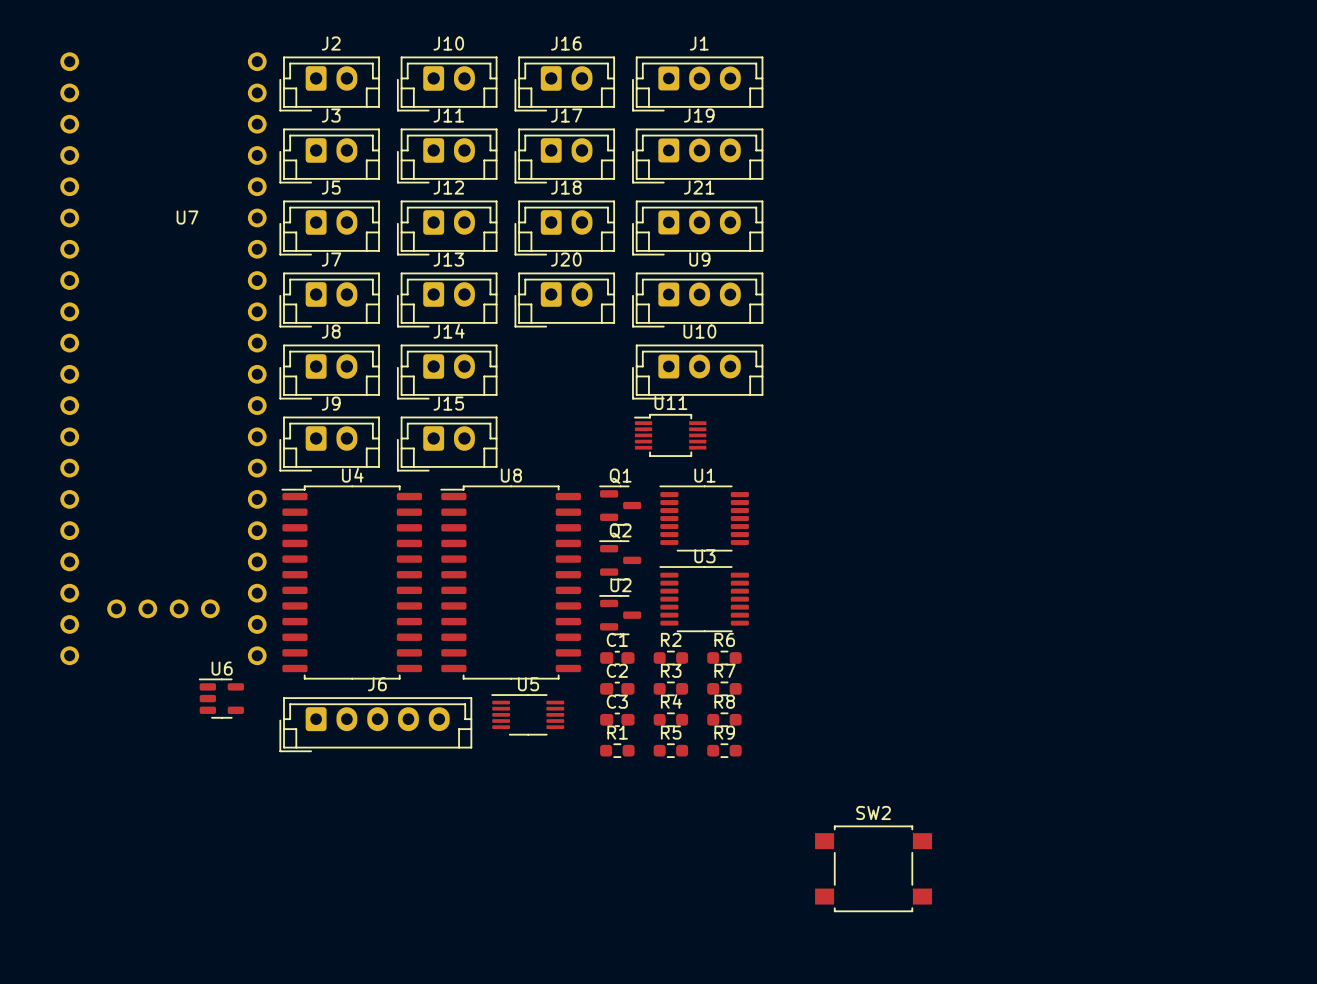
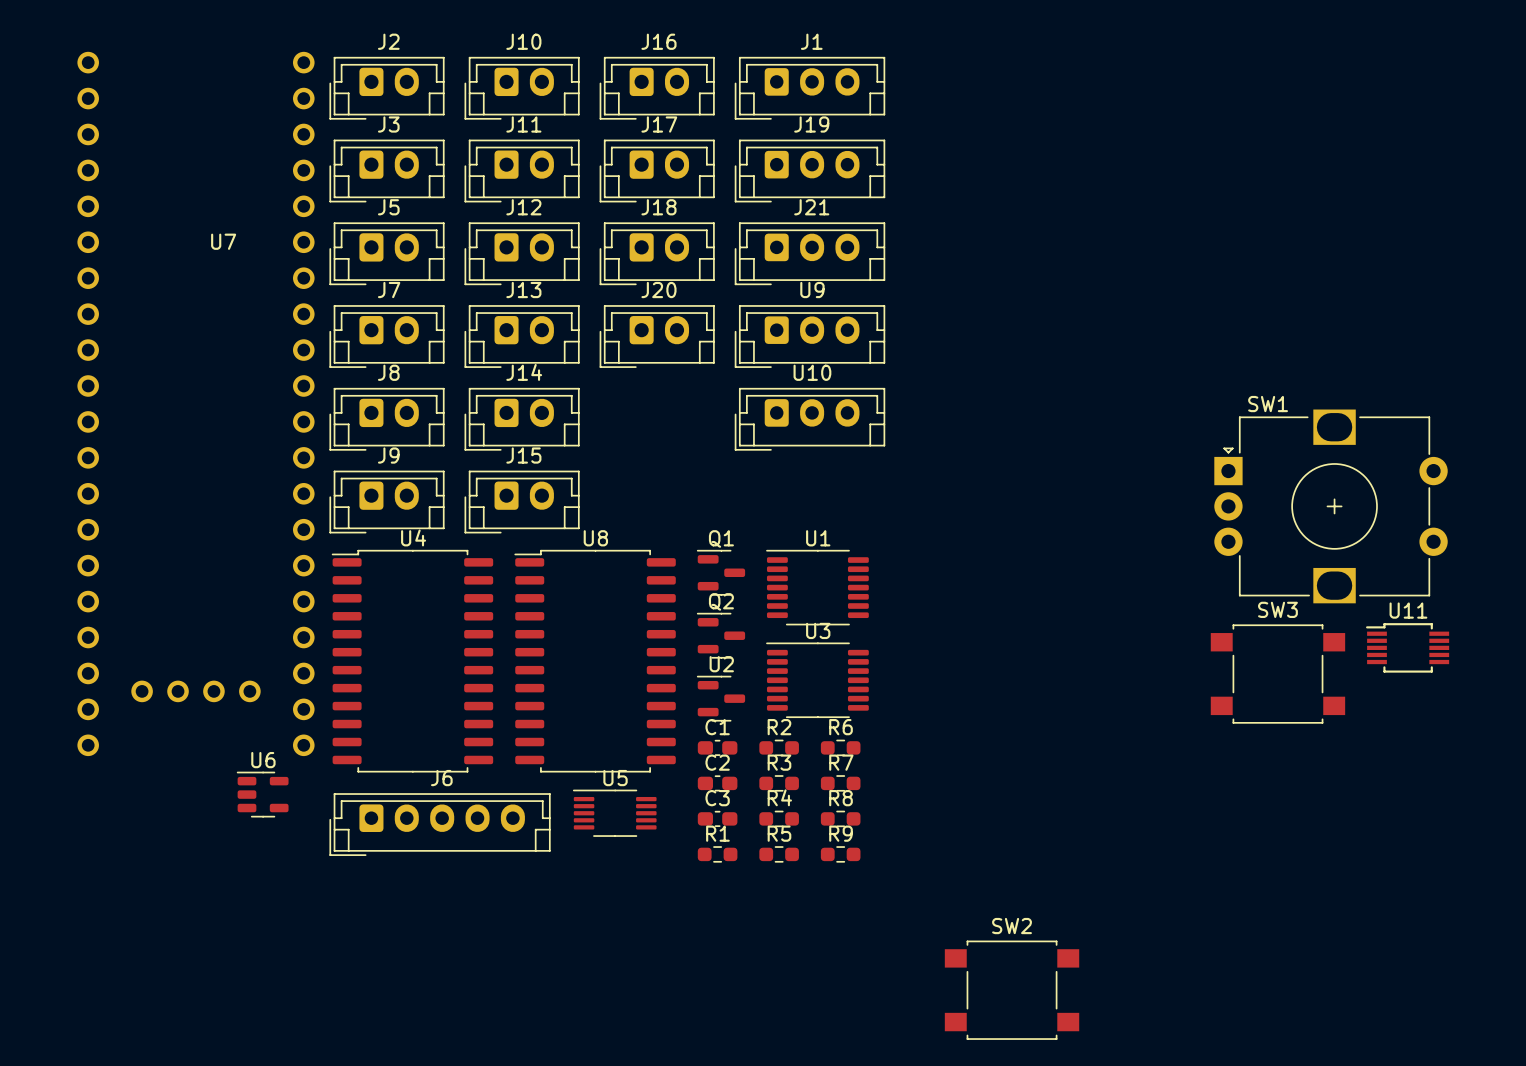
U11 position: (670, 435) -> (1407, 647)
SW1: none -> (1331, 506)
SW3: none -> (1277, 674)

